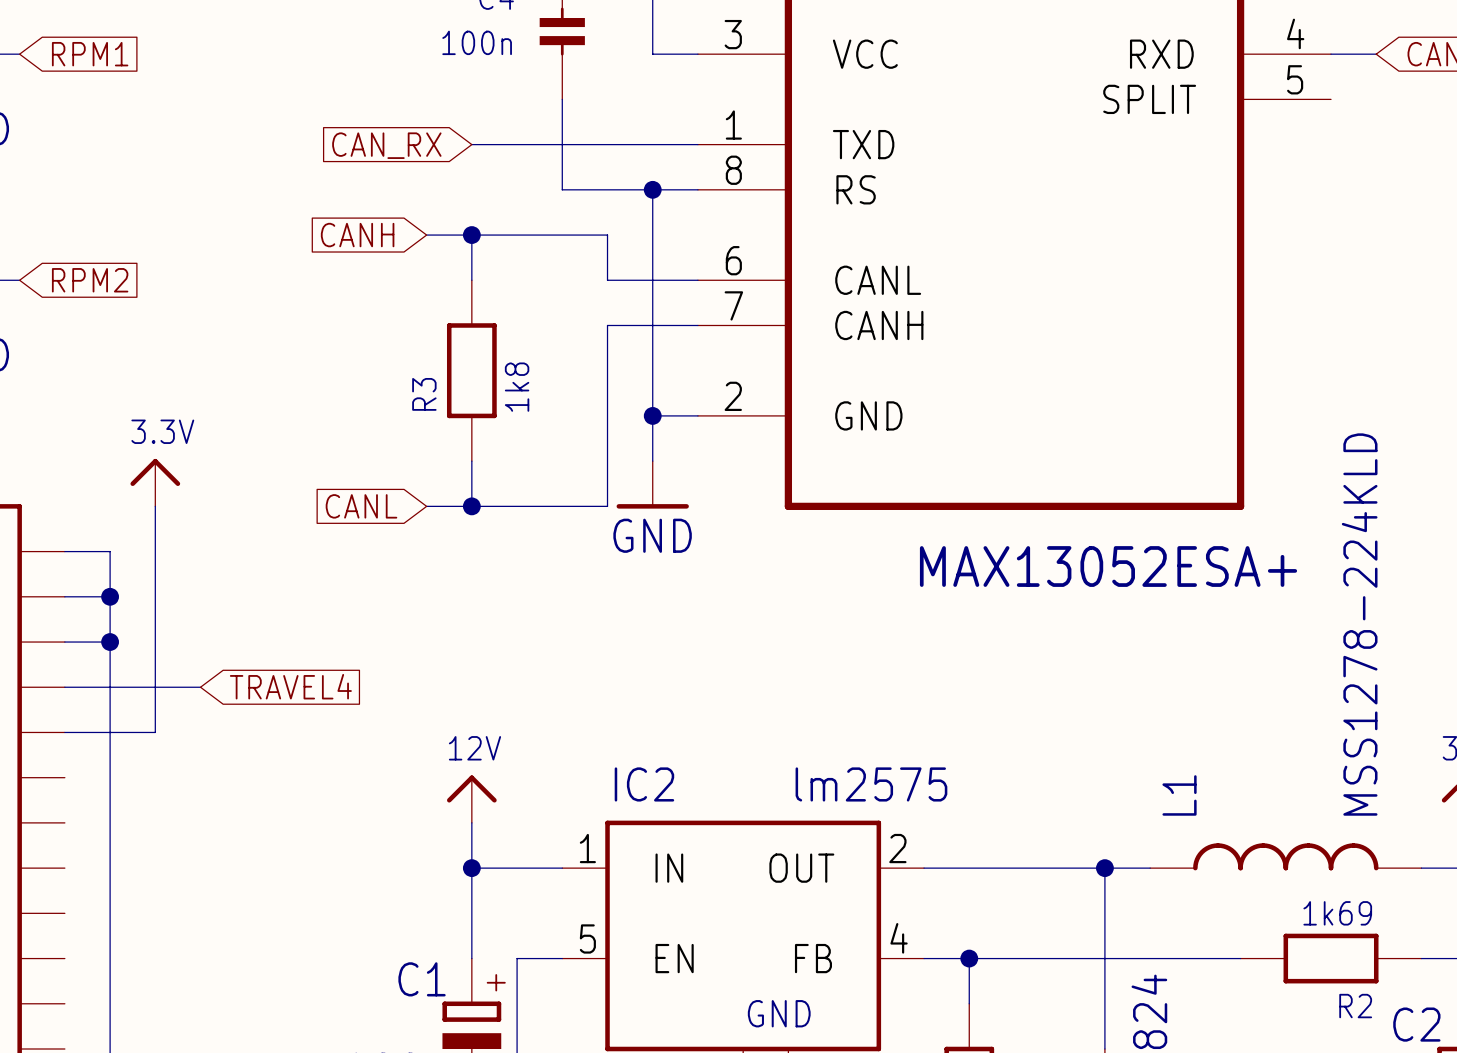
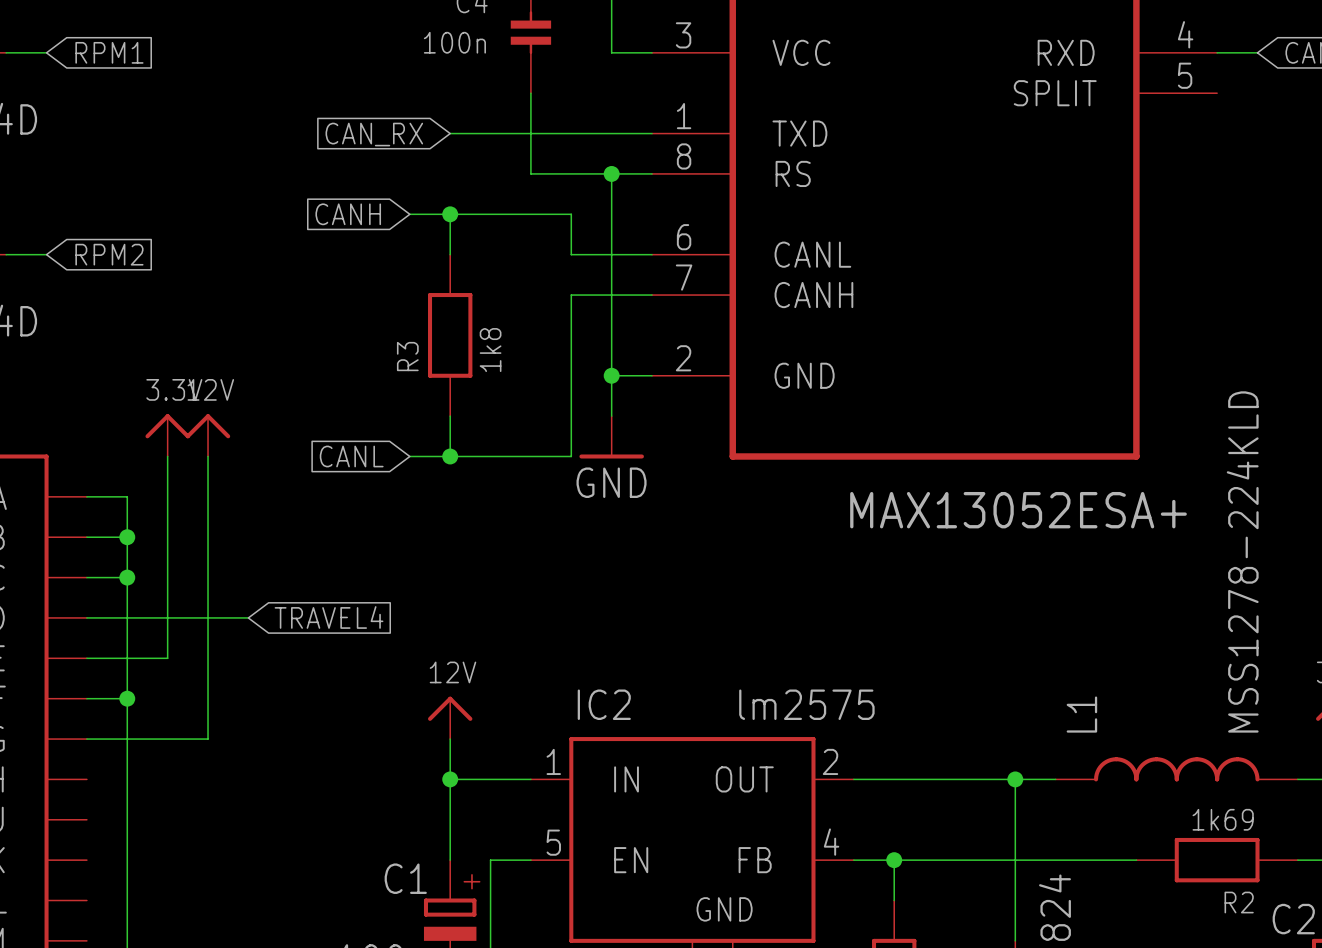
power symbol: none -> 12V (208, 435)
wire: none -> (208, 456) (208, 739) (86, 739)
global label position: TRAVEL4 (290, 686) -> TRAVEL4 (329, 617)
wire: none -> (208, 617) (248, 617)
wire: none -> (86, 698) (127, 698)
junction: none -> (127, 698)

